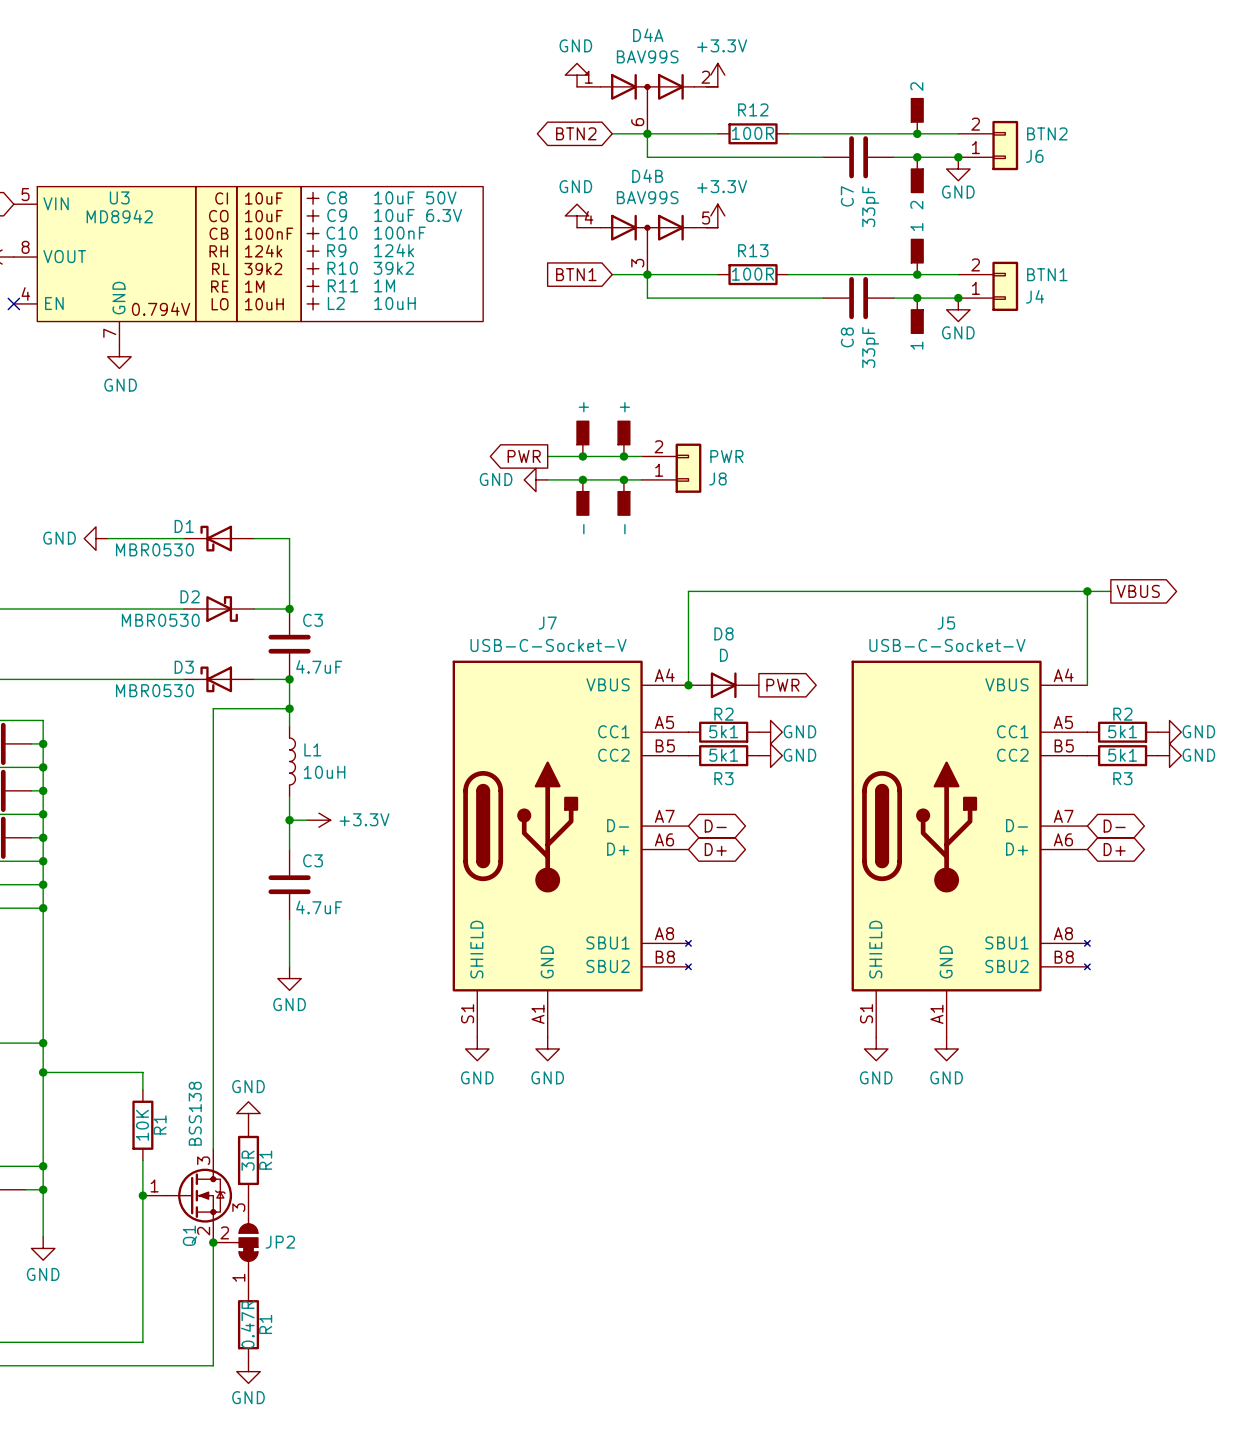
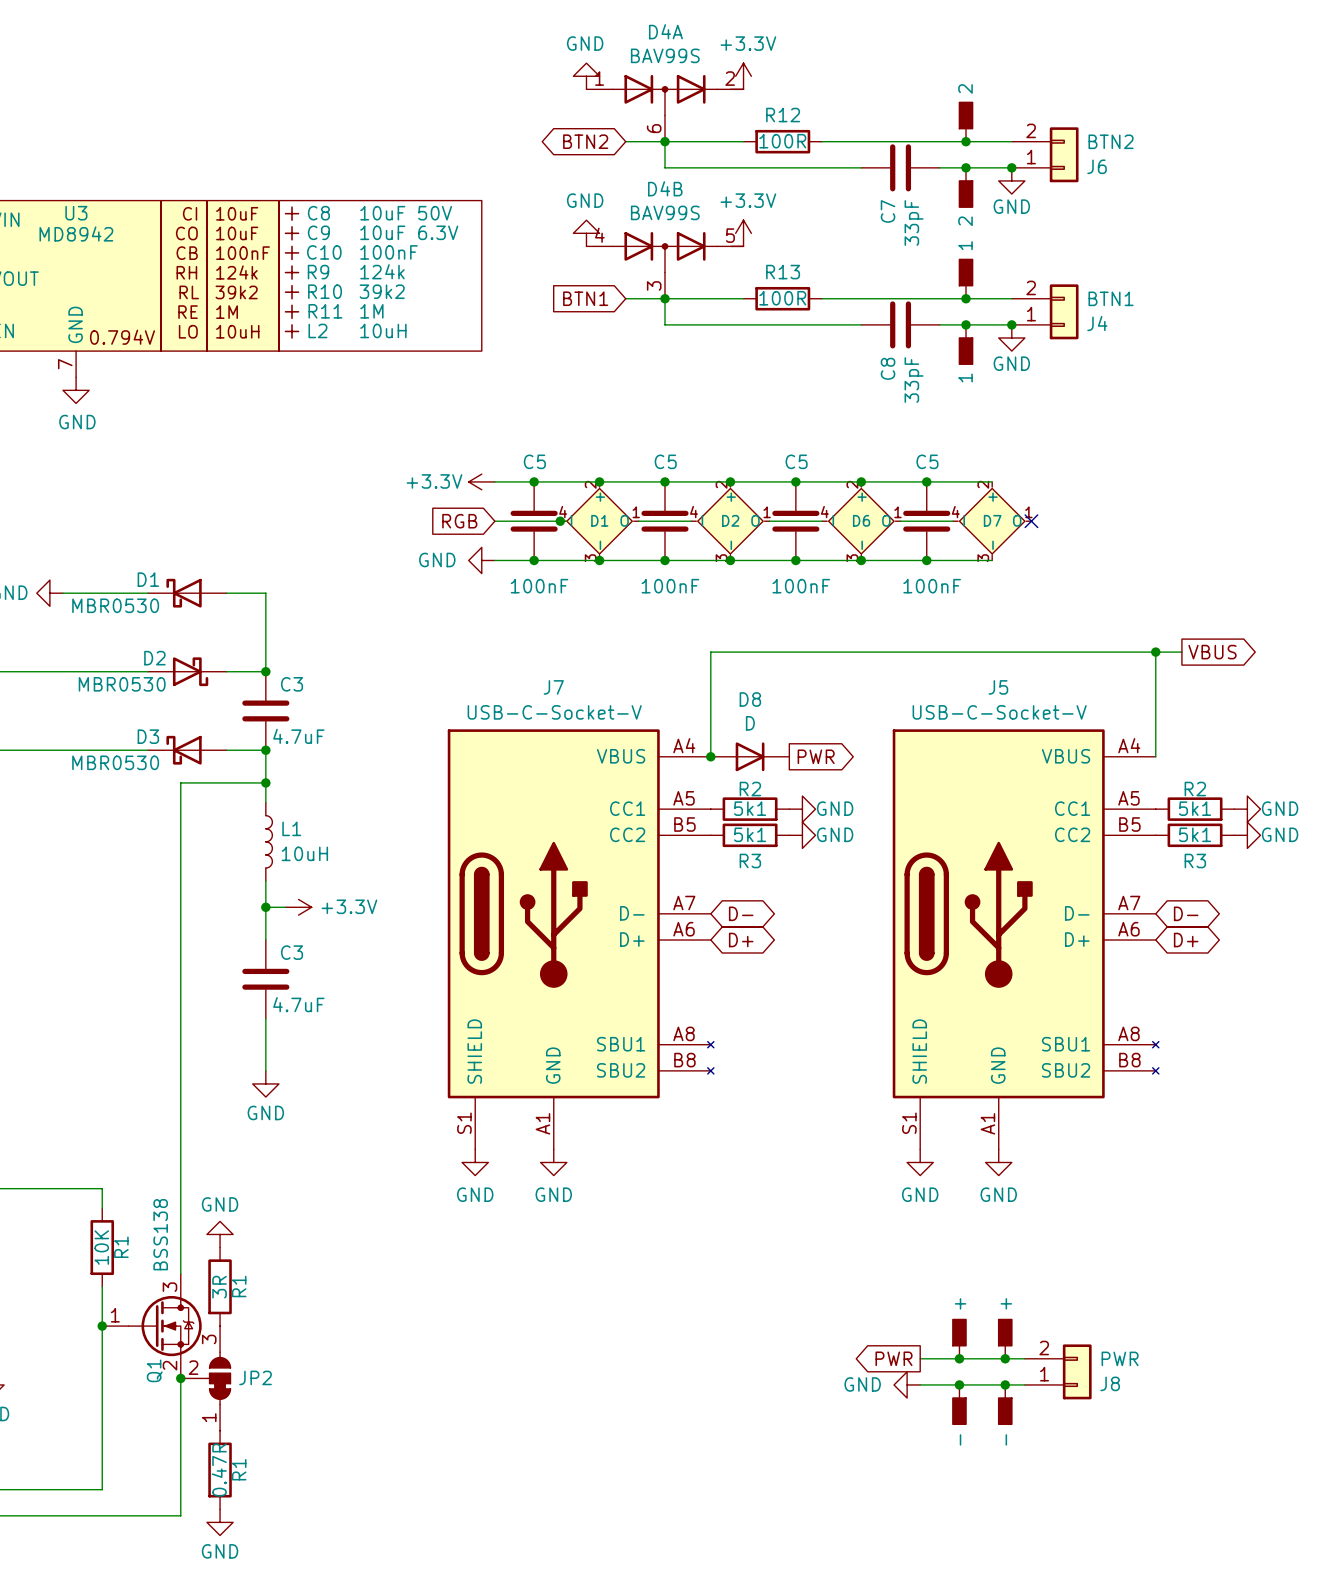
power symbol: none -> +3.3V (481, 481)
wire: none -> (494, 481) (992, 481)
junction: none -> (534, 481)
part: + (582, 438) -> none
junction: none -> (599, 481)
part: + (623, 438) -> none
junction: none -> (665, 481)
junction: none -> (730, 481)
junction: none -> (795, 481)
junction: none -> (861, 481)
junction: none -> (926, 481)
global label: PWR (524, 456) -> none
wire: (547, 456) (641, 456) -> none
junction: (582, 456) -> none
junction: (623, 456) -> none
J8 position: (671, 468) -> (1058, 1371)
global label: none -> RGB (459, 521)
wire: none -> (494, 521) (566, 521)
C5: none -> 100nF (534, 521)
junction: none -> (560, 521)
D1: none -> (599, 521)
wire: none -> (638, 521) (691, 521)
C5: none -> 100nF (665, 521)
D2: none -> (730, 521)
wire: none -> (769, 521) (822, 521)
C5: none -> 100nF (795, 521)
D6: none -> (861, 521)
wire: none -> (900, 521) (952, 521)
C5: none -> 100nF (926, 521)
D7: none -> (992, 521)
no-connect mark: none -> (1031, 521)
power symbol position: GND (535, 479) -> GND (481, 560)
junction: (582, 479) -> none
junction: (623, 479) -> none
part: - (582, 497) -> none
part: - (623, 497) -> none
wire: none -> (494, 560) (992, 560)
junction: none -> (534, 560)
junction: none -> (599, 560)
junction: none -> (665, 560)
junction: none -> (730, 560)
junction: none -> (795, 560)
junction: none -> (861, 560)
junction: none -> (926, 560)
part: none -> + (959, 1338)
part: none -> + (1005, 1338)
global label: none -> PWR (894, 1358)
wire: none -> (920, 1358) (1024, 1358)
junction: none -> (959, 1358)
junction: none -> (1005, 1358)
power symbol: none -> GND (907, 1384)
wire: none -> (920, 1384) (1024, 1384)
junction: none -> (959, 1384)
junction: none -> (1005, 1384)
part: none -> - (959, 1404)
part: none -> - (1005, 1404)

